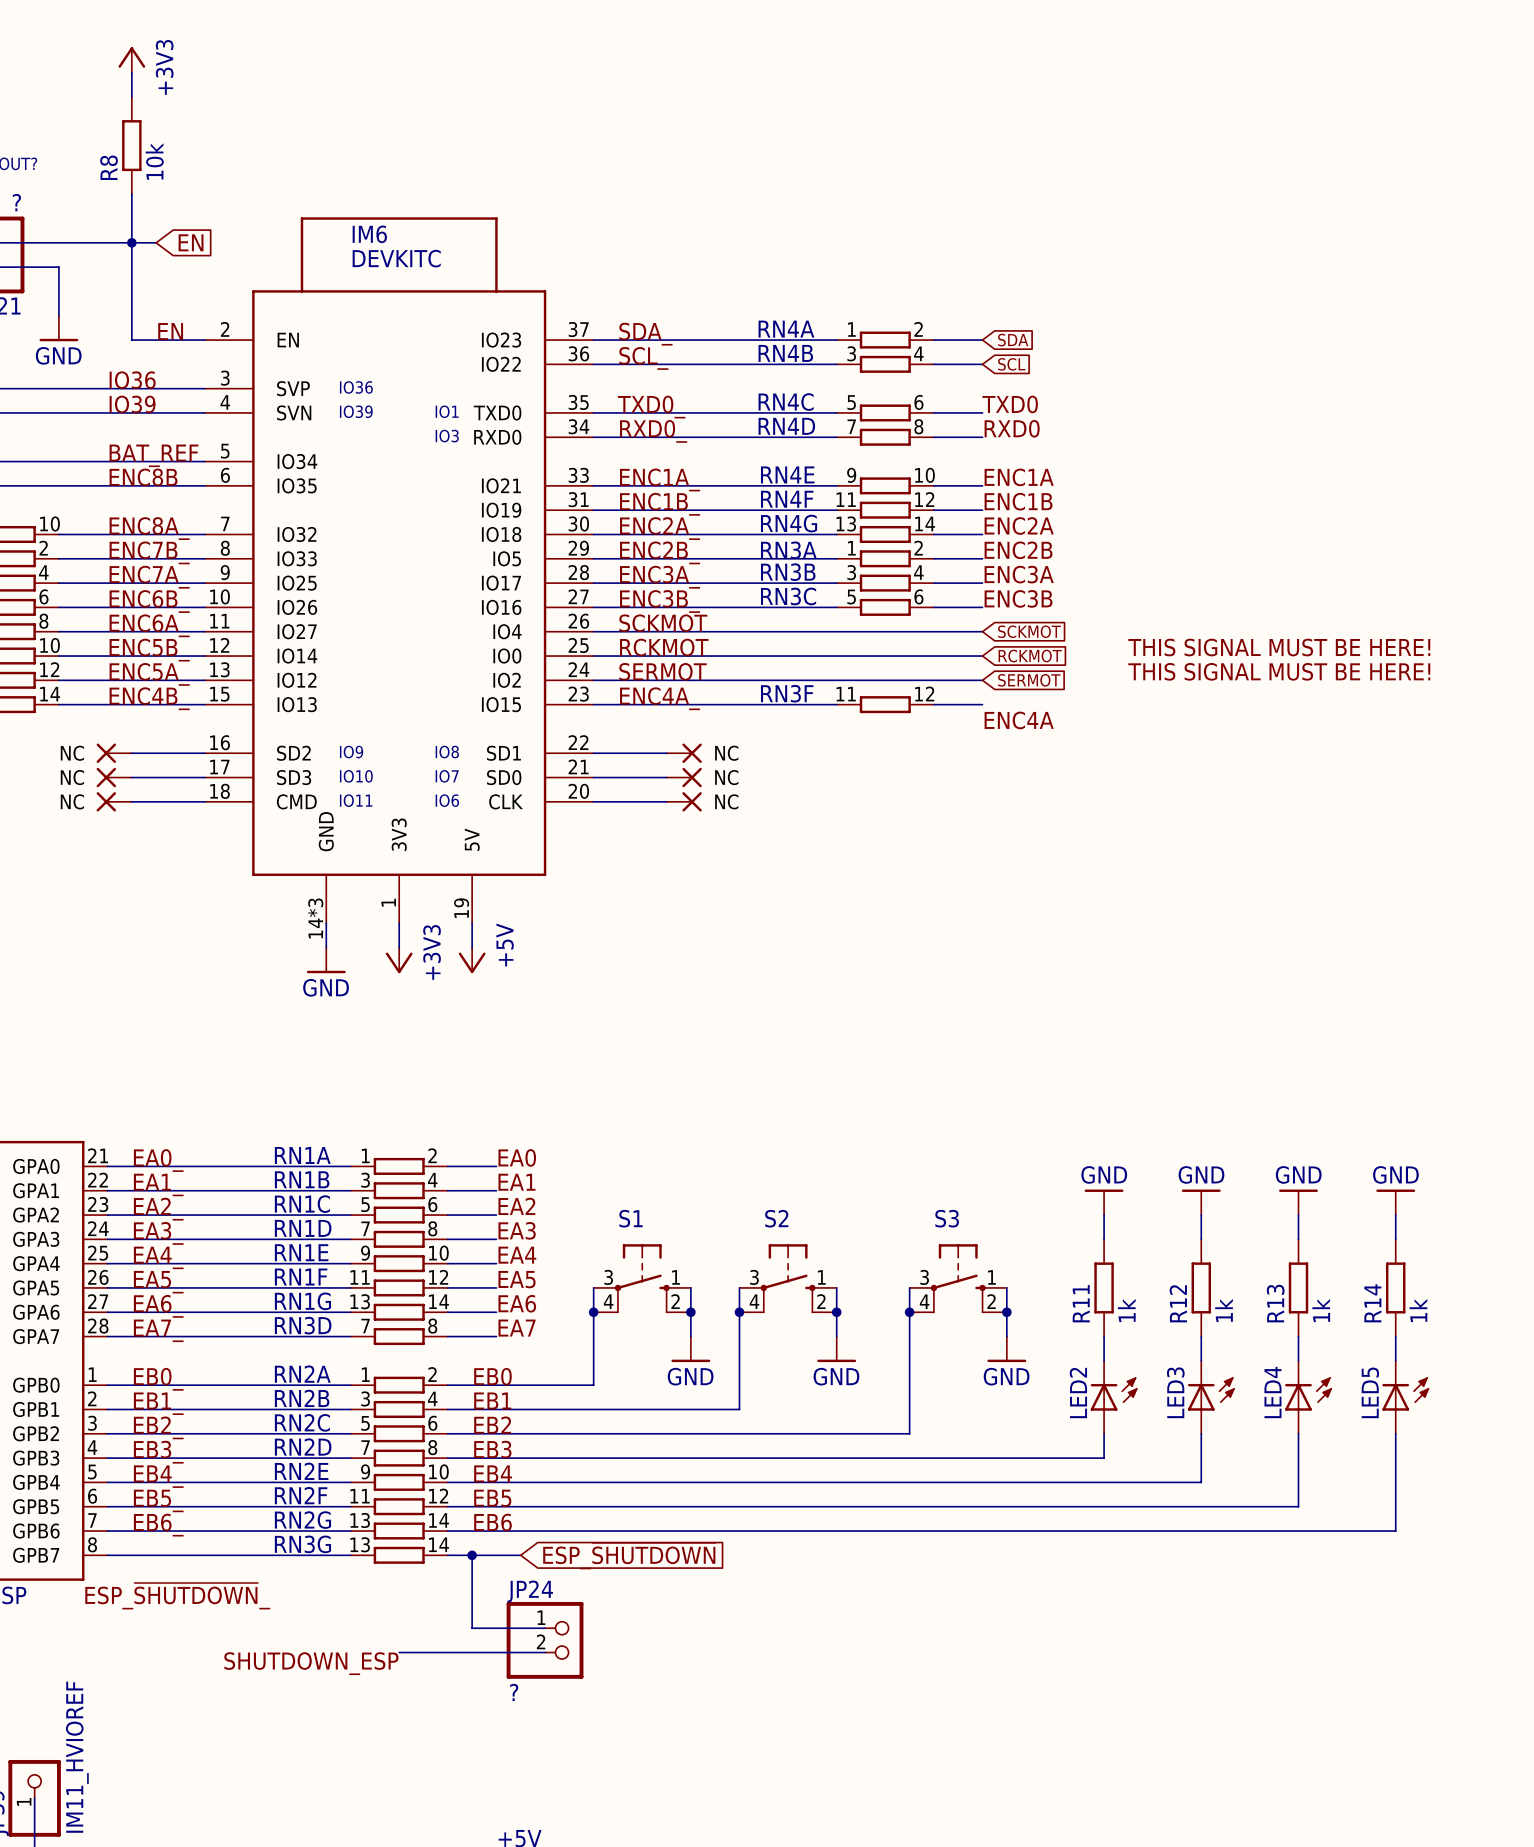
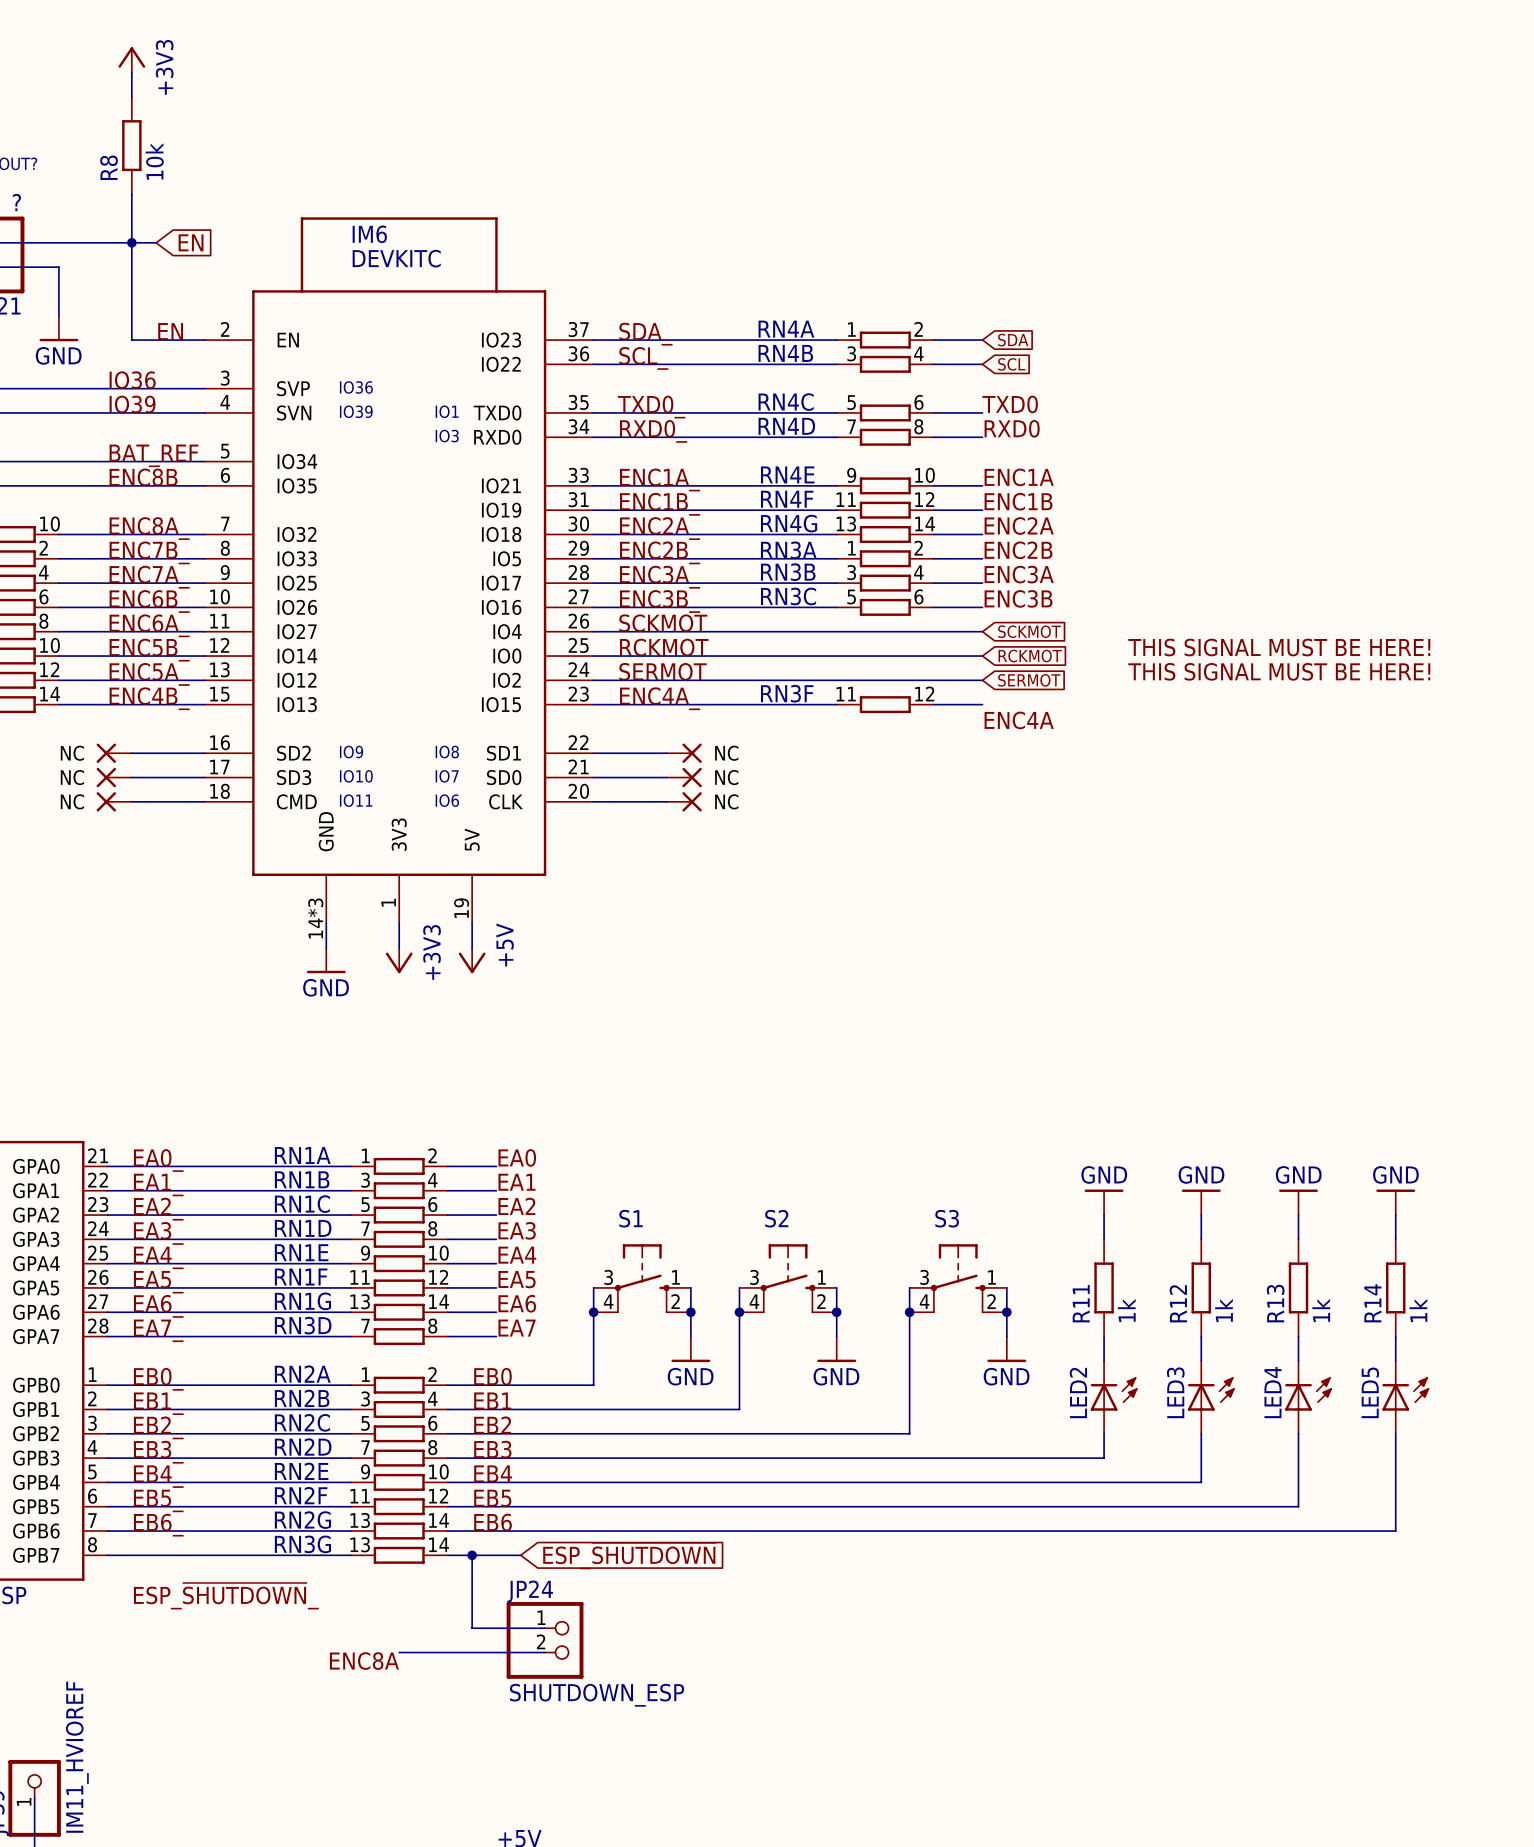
label position: ESP_~{SHUTDOWN}_ (177, 1596) -> ESP_~{SHUTDOWN}_ (226, 1596)
label: SHUTDOWN_ESP (311, 1663) -> ENC8A (364, 1661)
JP24 value: ? (514, 1692) -> SHUTDOWN_ESP (597, 1695)

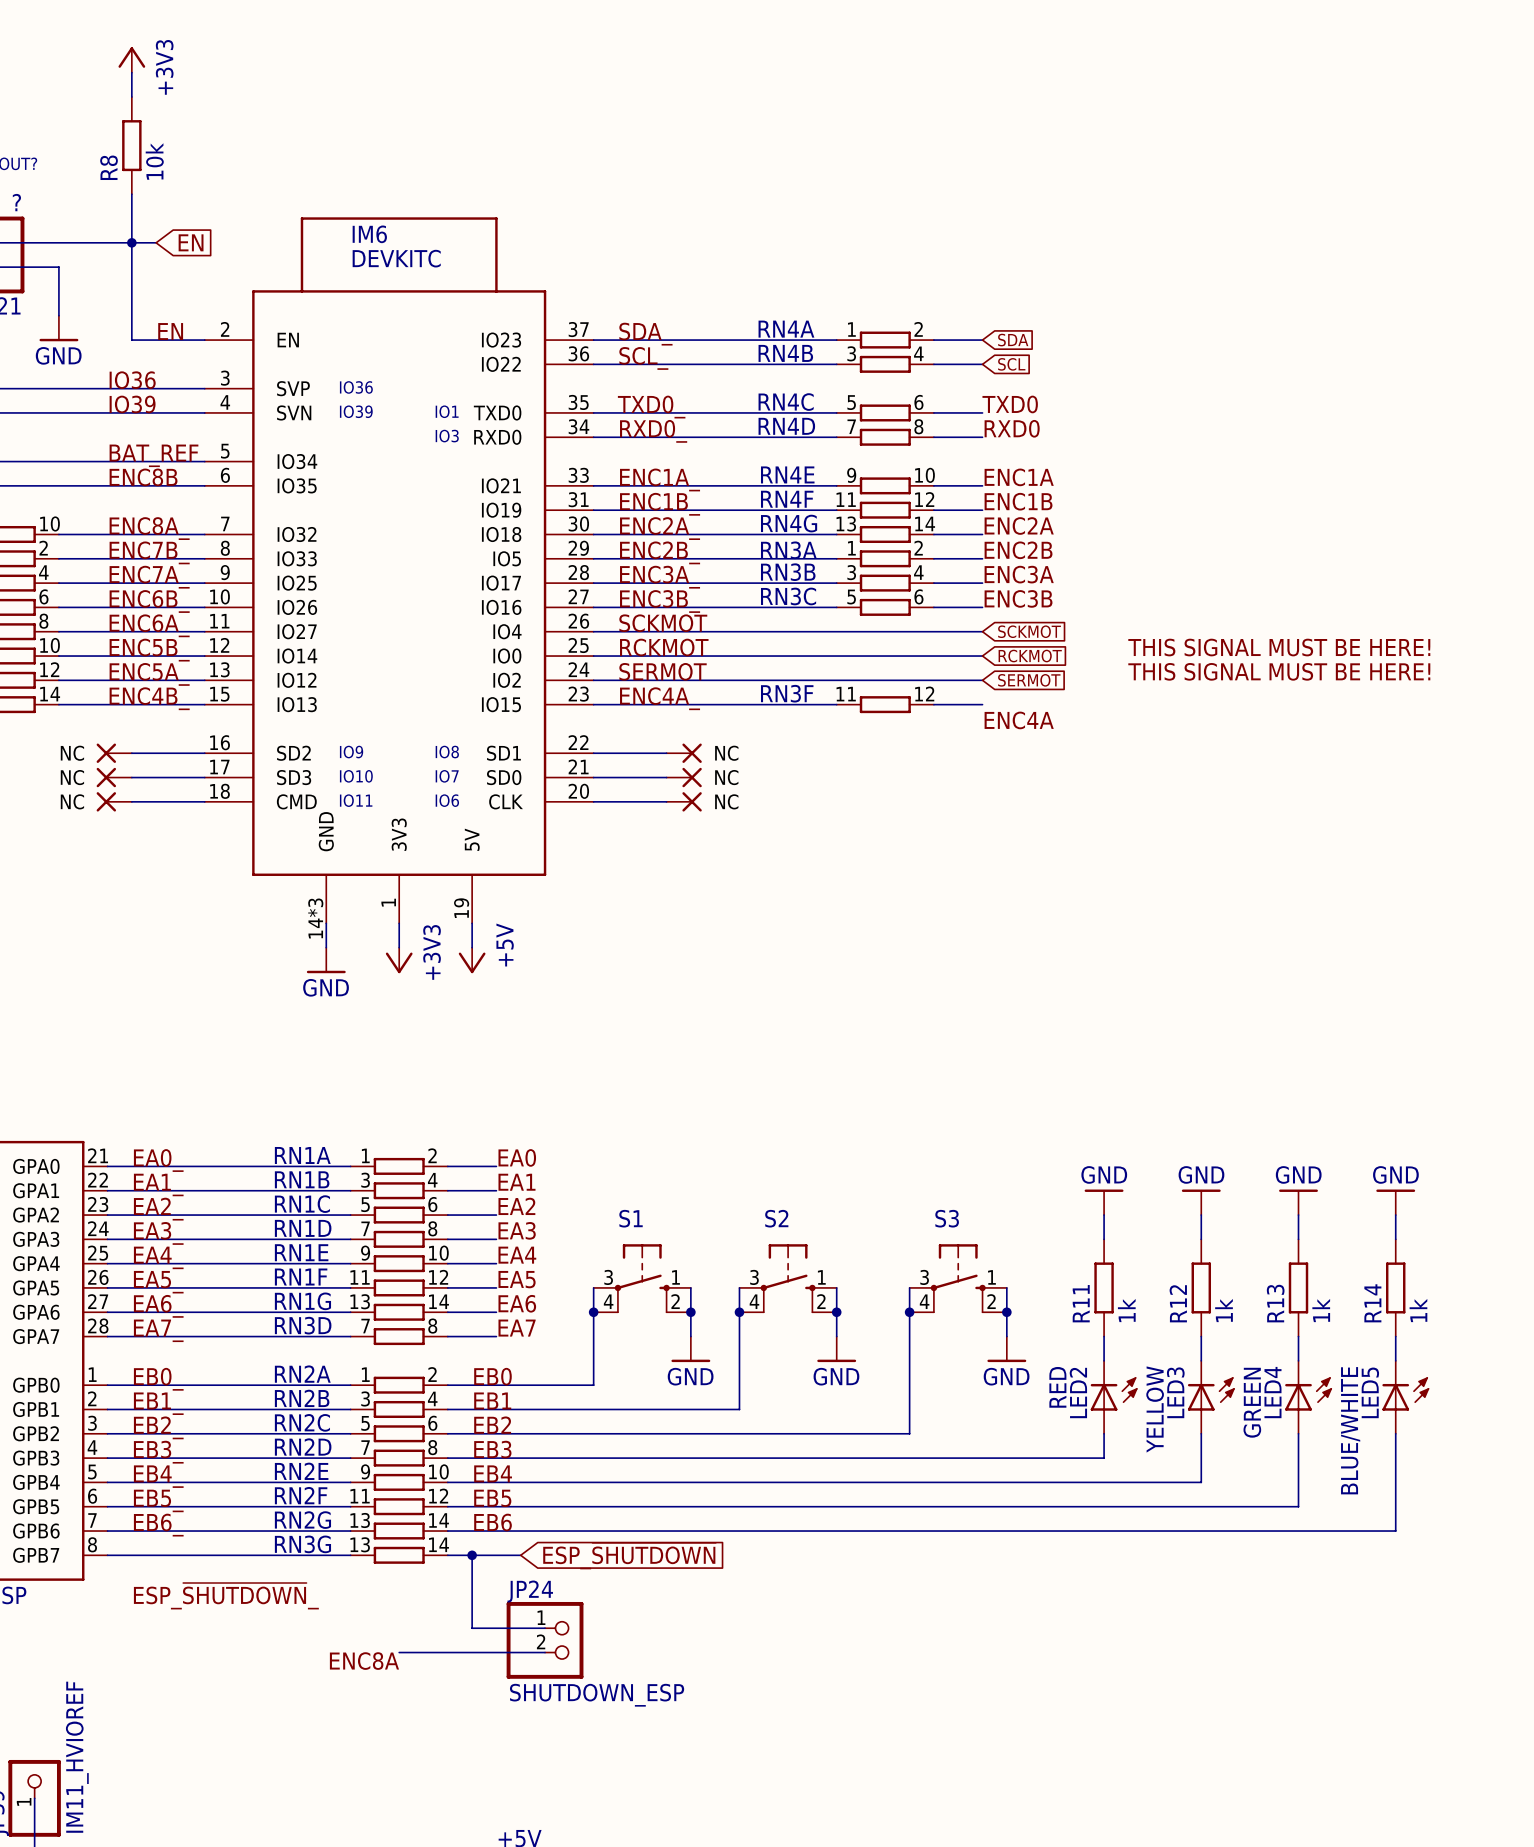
LED2 value: none -> RED (1057, 1387)
LED4 value: none -> GREEN (1252, 1402)
LED3 value: none -> YELLOW (1155, 1409)
LED5 value: none -> BLUE/WHITE (1350, 1430)

